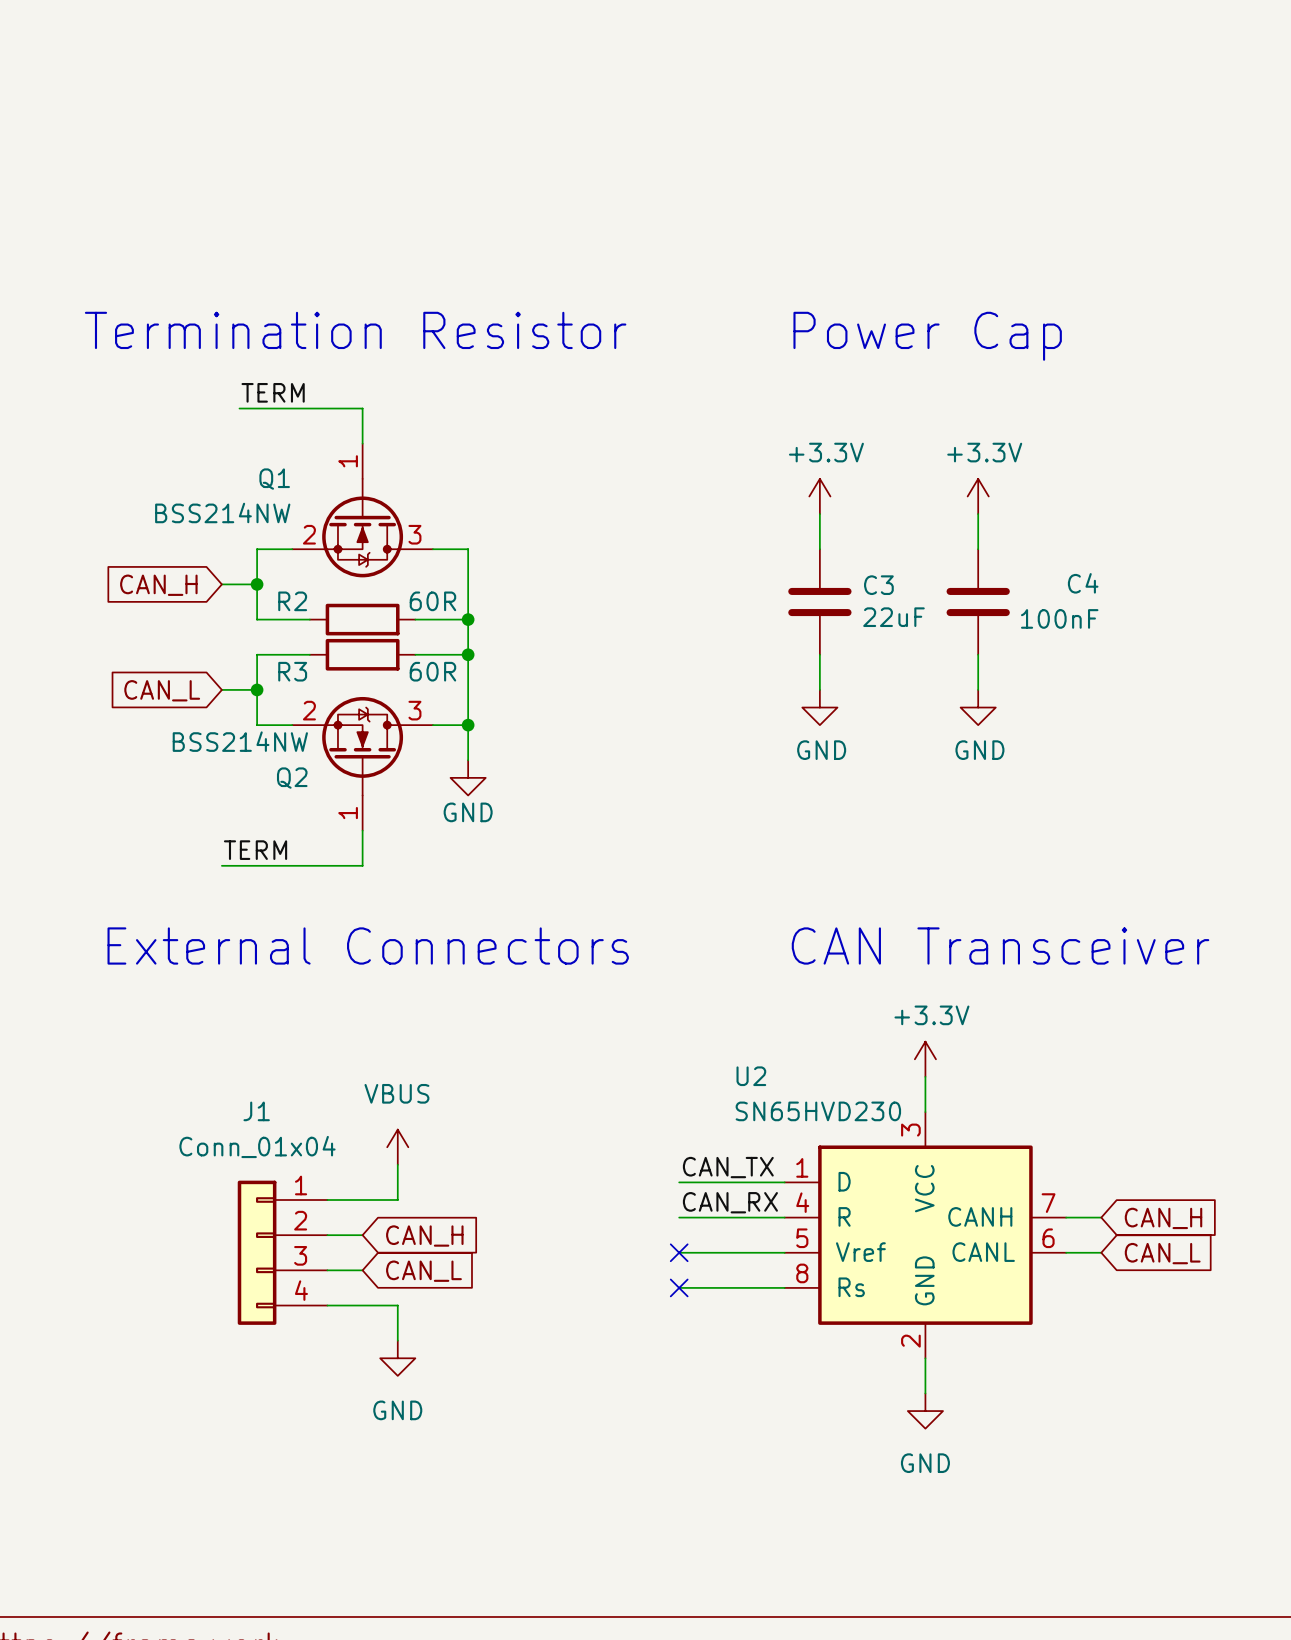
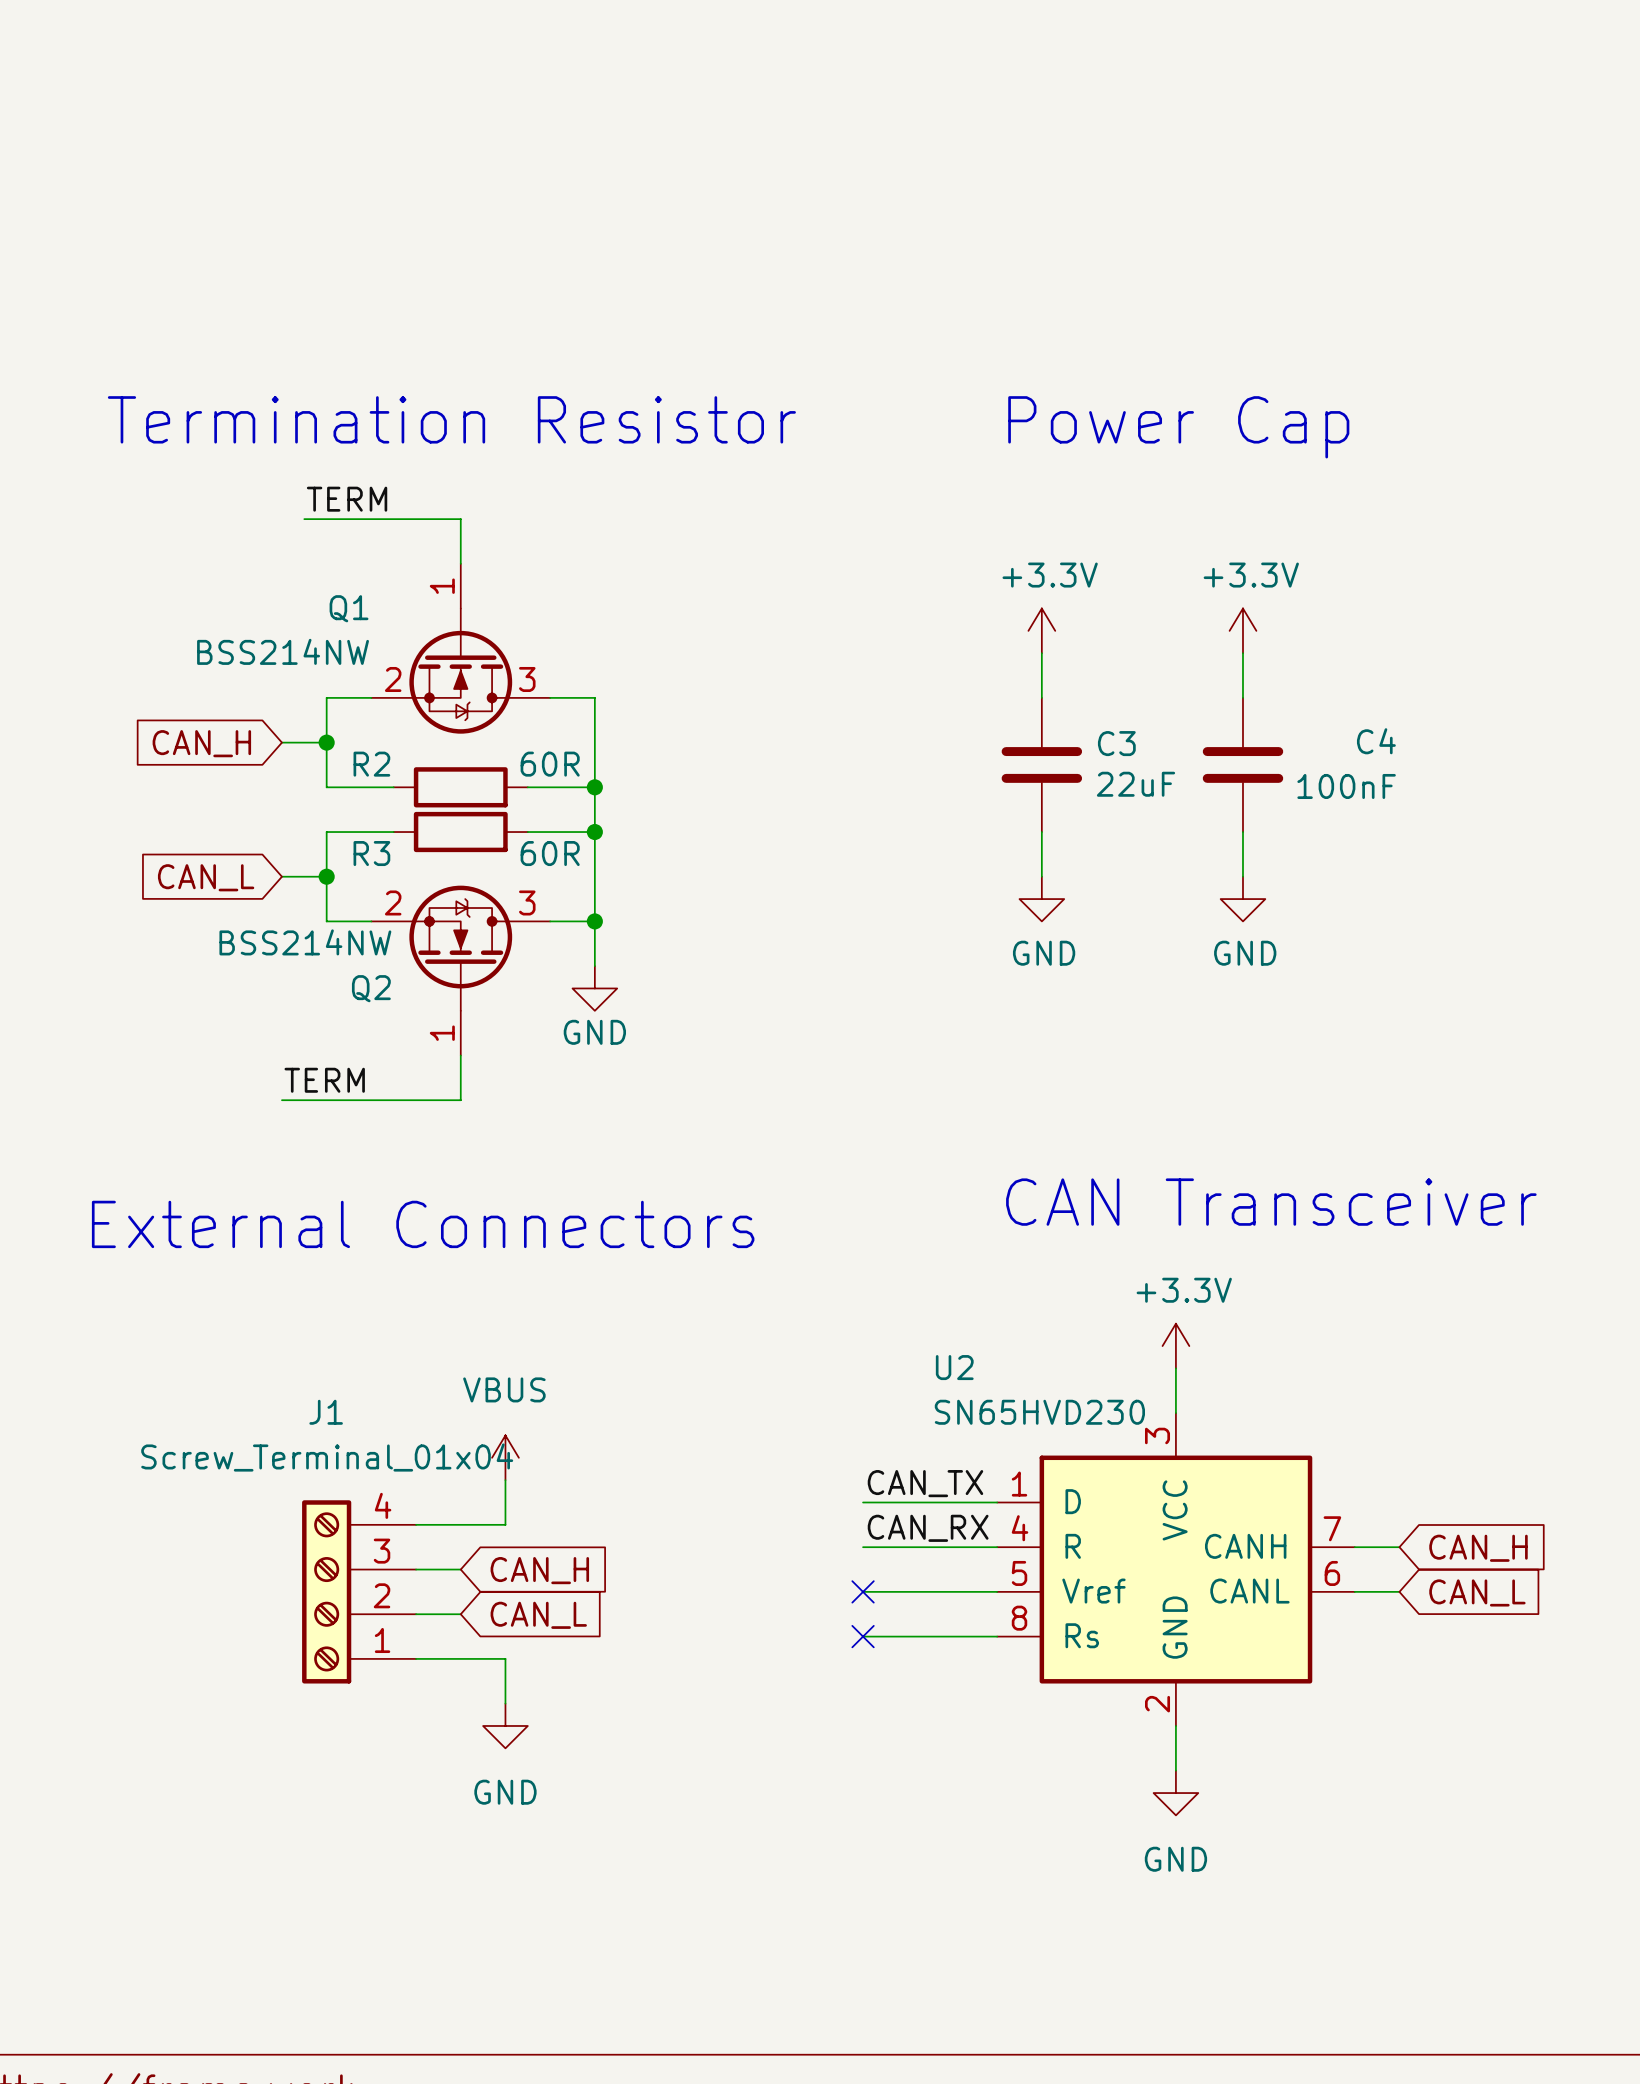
text position: External Connectors (368, 946) -> External Connectors (423, 1224)
J1 value: Conn_01x04 (257, 1146) -> Screw_Terminal_01x04 (327, 1457)
J1 symbol: [237, 1180, 328, 1325] -> [302, 1500, 417, 1684]

